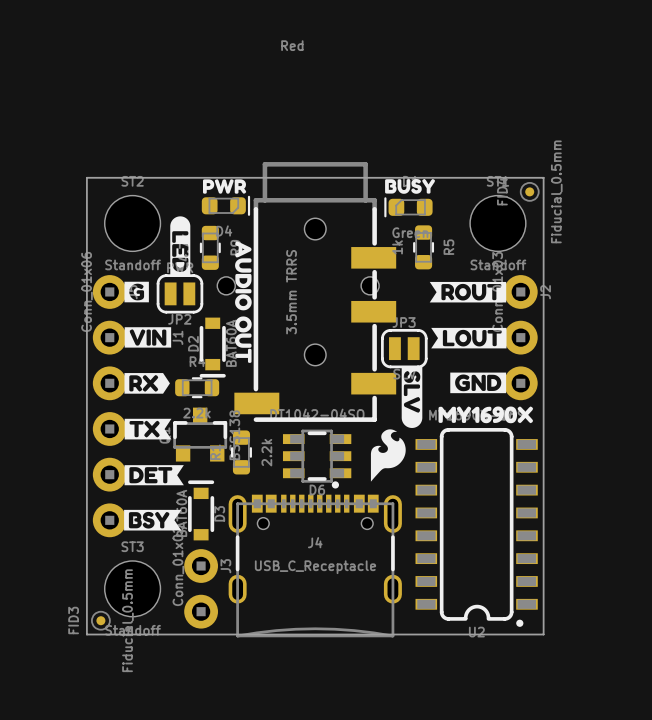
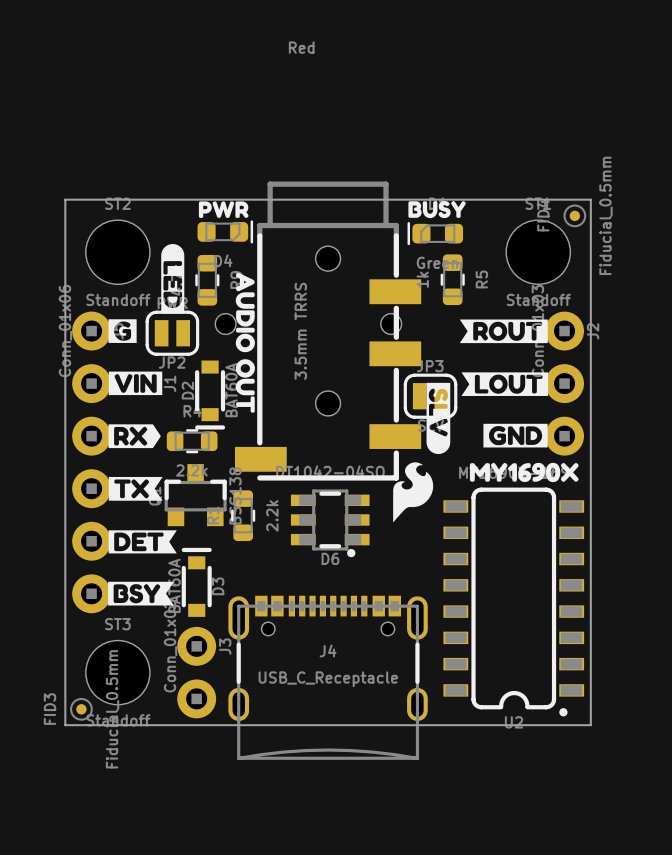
drawing position: (412, 397) -> (438, 418)
drawing position: (388, 455) -> (413, 492)
J4 position: (315, 566) -> (328, 677)

